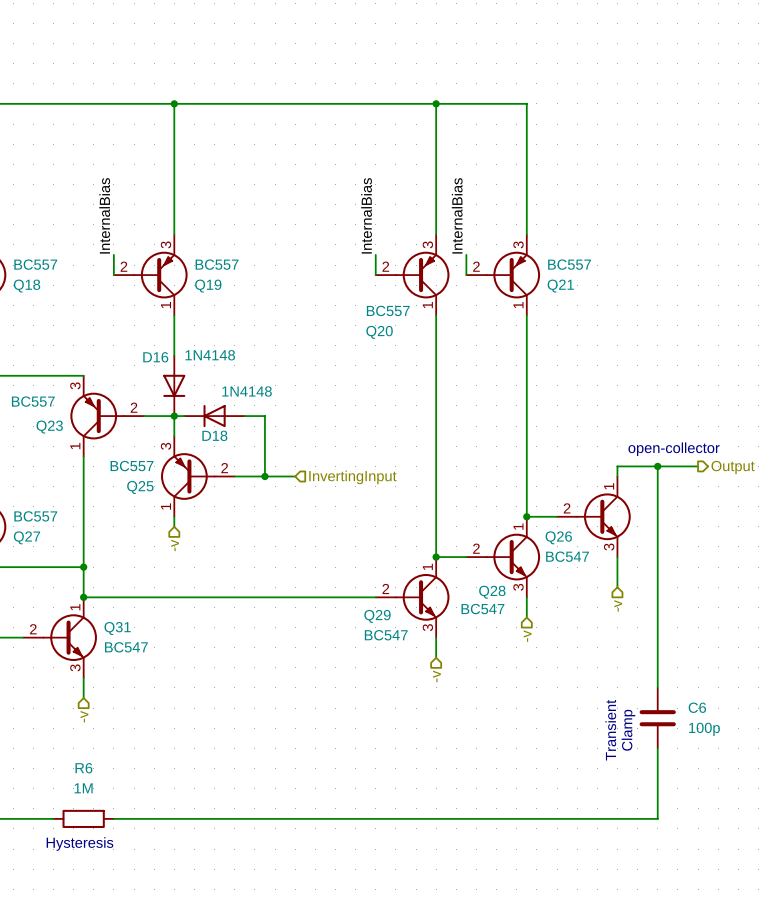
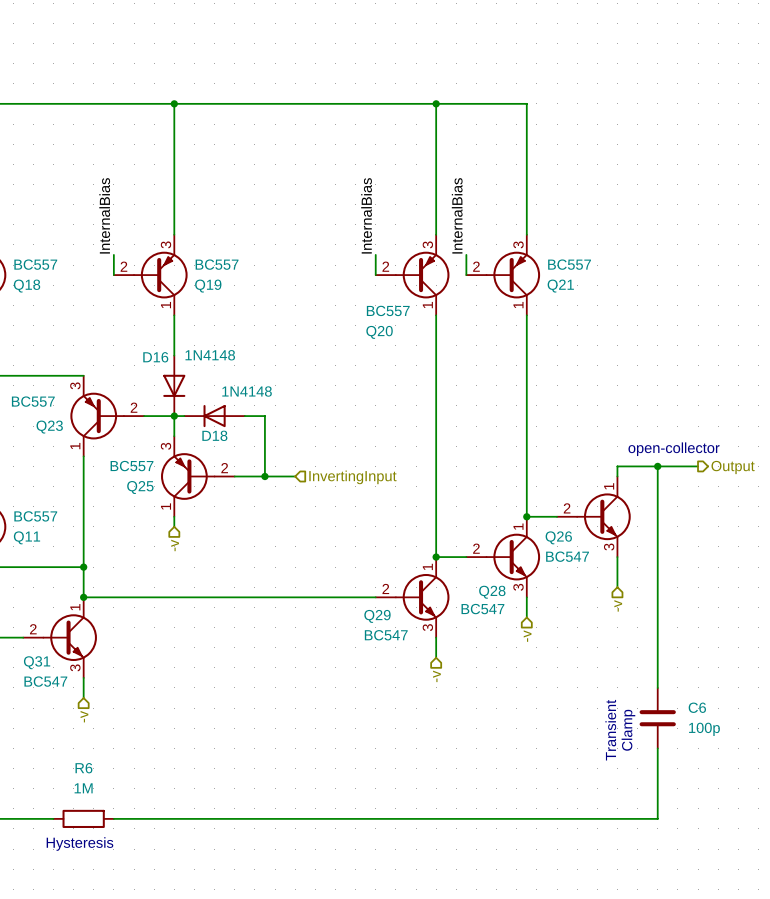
Q27 name: Q27 (26, 537) -> Q11 (26, 537)
Q31 name position: Q31 (117, 628) -> Q31 (37, 662)
Q31 value position: BC547 (126, 647) -> BC547 (45, 681)

